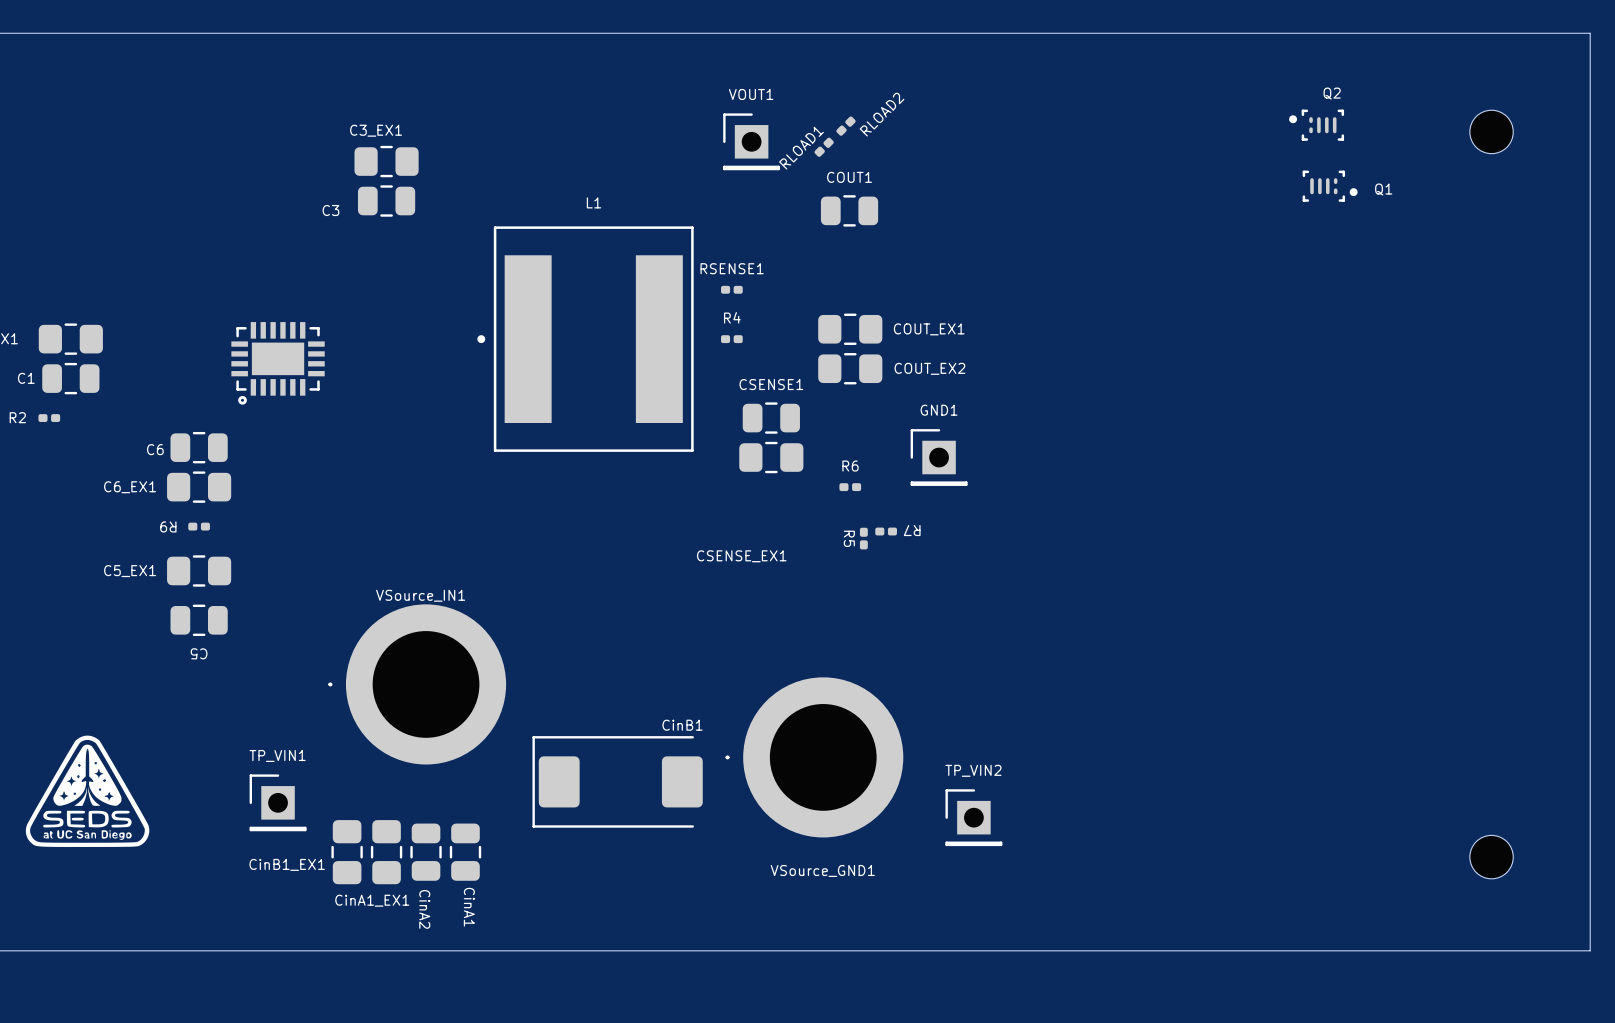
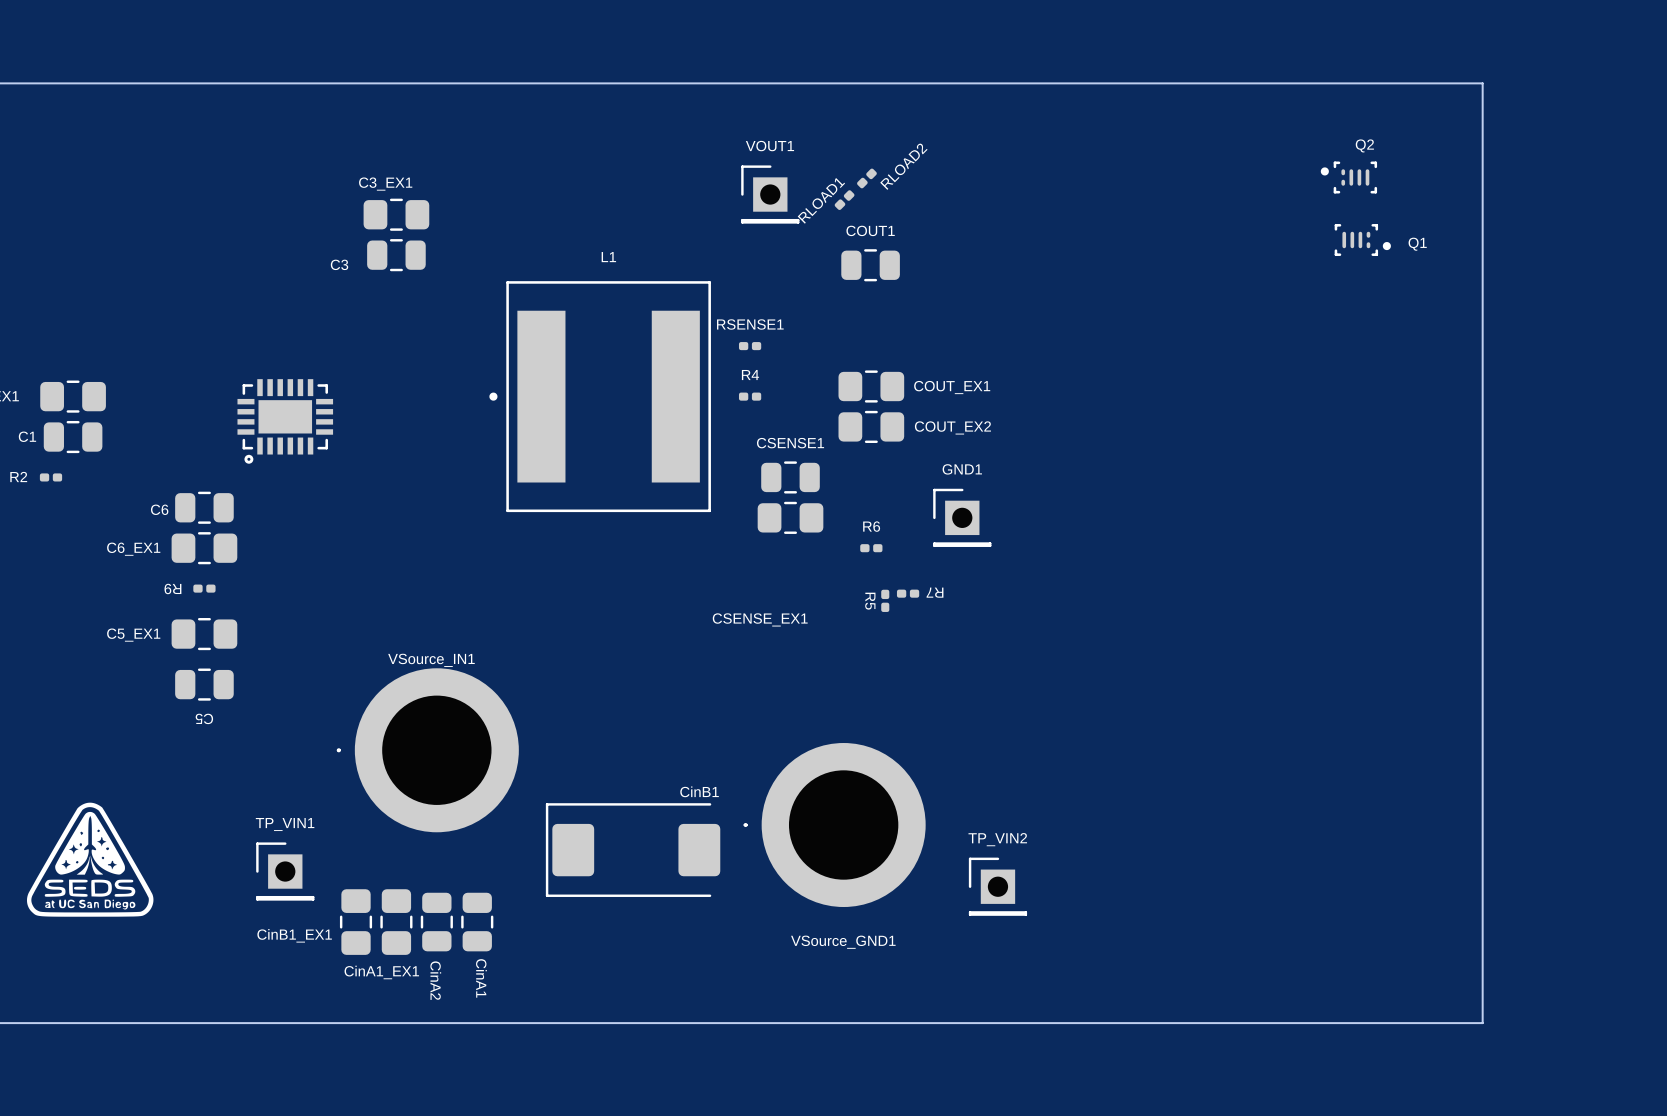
board edge: (1447, 33) (1590, 33) (1590, 950) (1447, 950) -> (1482, 83) (1482, 1023)
part: (1491, 131) -> none
part: (1491, 857) -> none

